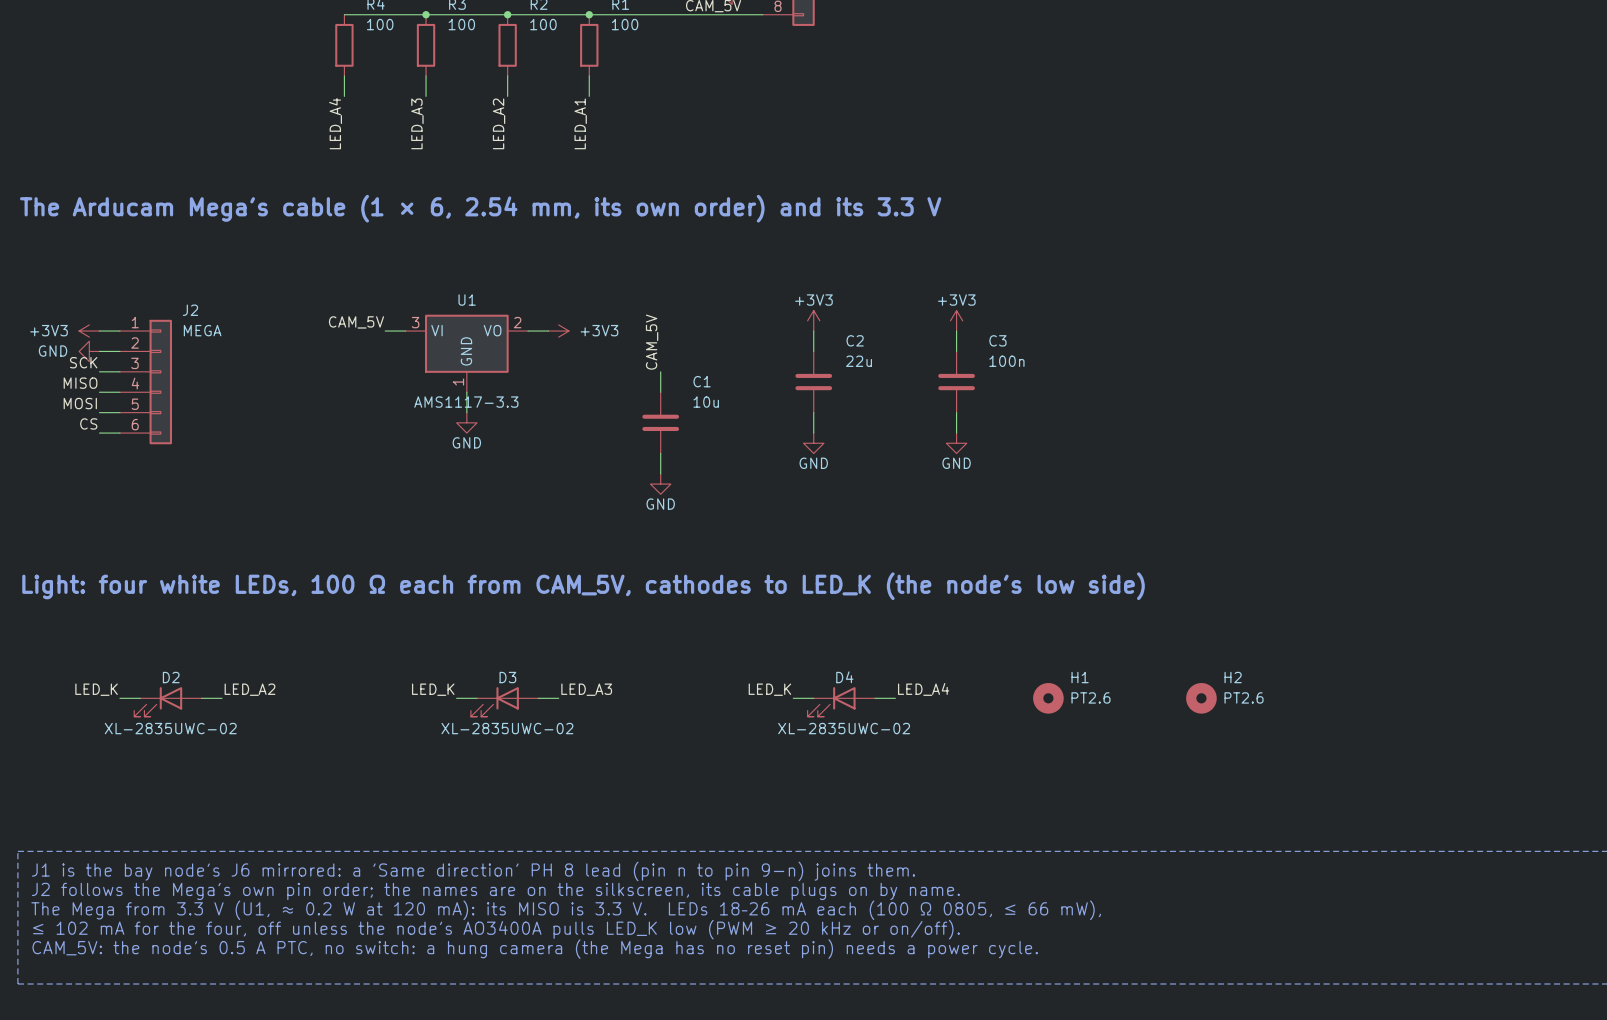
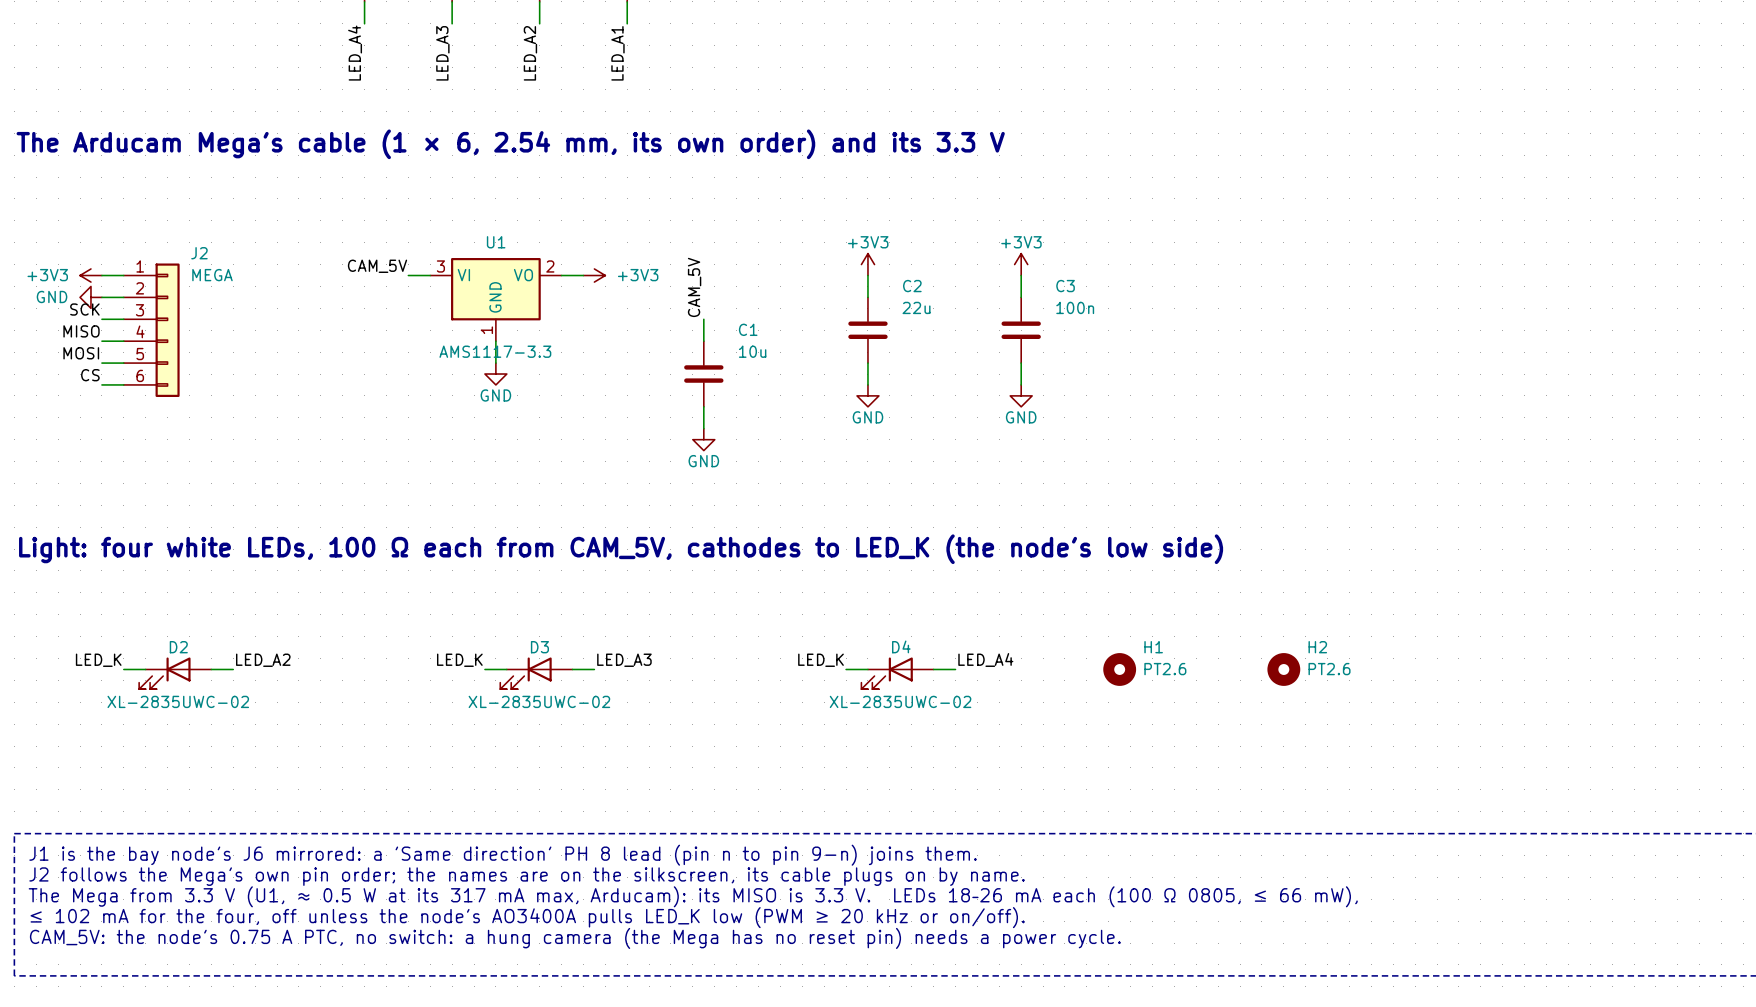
text: The Mega from 3.3 V (U1, ≈ 0.2 W at 120 mA): its MISO is 3.3 V. LEDs 18–26 mA each (100 Ω 0805, ≤ 66 mW), (566, 910) -> The Mega from 3.3 V (U1, ≈ 0.5 W at its 317 mA max, Arducam): its MISO is 3.3 V. LEDs 18–26 mA each (100 Ω 0805, ≤ 66 mW), (693, 896)
text: CAM_5V: the node's 0.5 A PTC, no switch: a hung camera (the Mega has no reset pin) needs a power cycle. (535, 949) -> CAM_5V: the node's 0.75 A PTC, no switch: a hung camera (the Mega has no reset pin) needs a power cycle. (575, 938)

